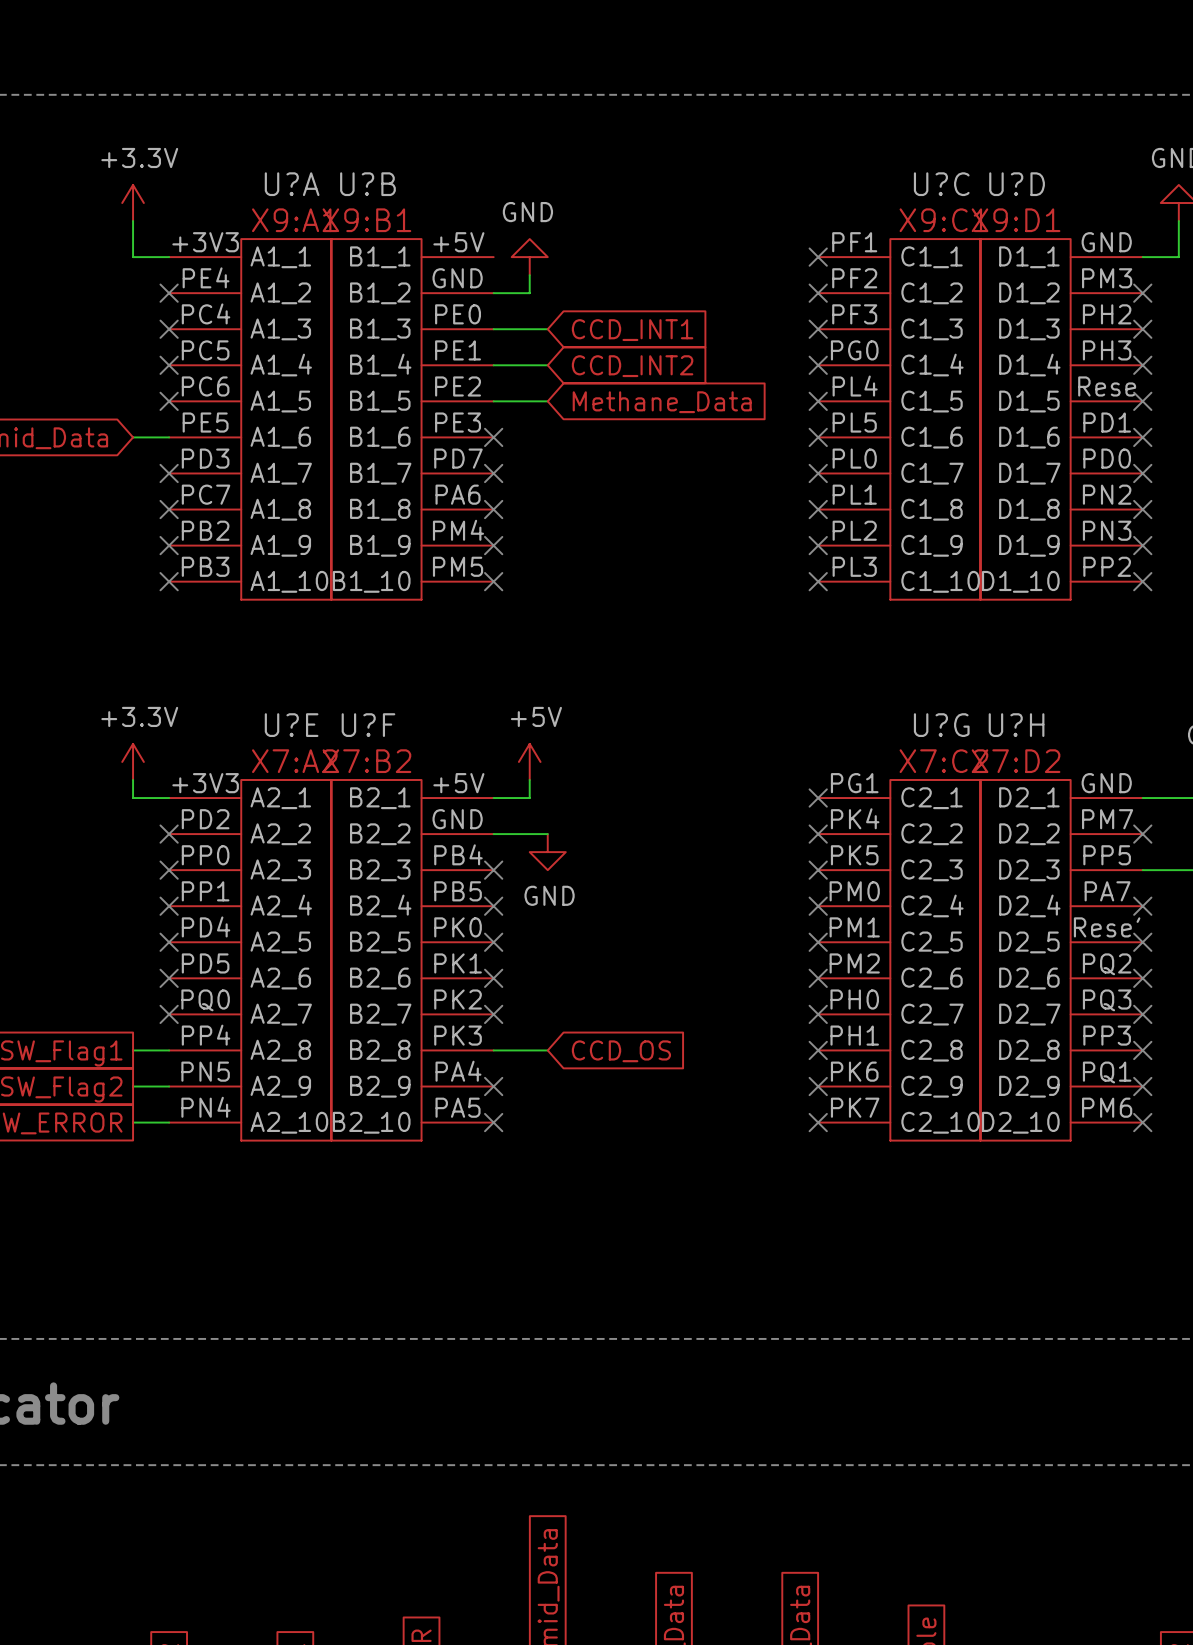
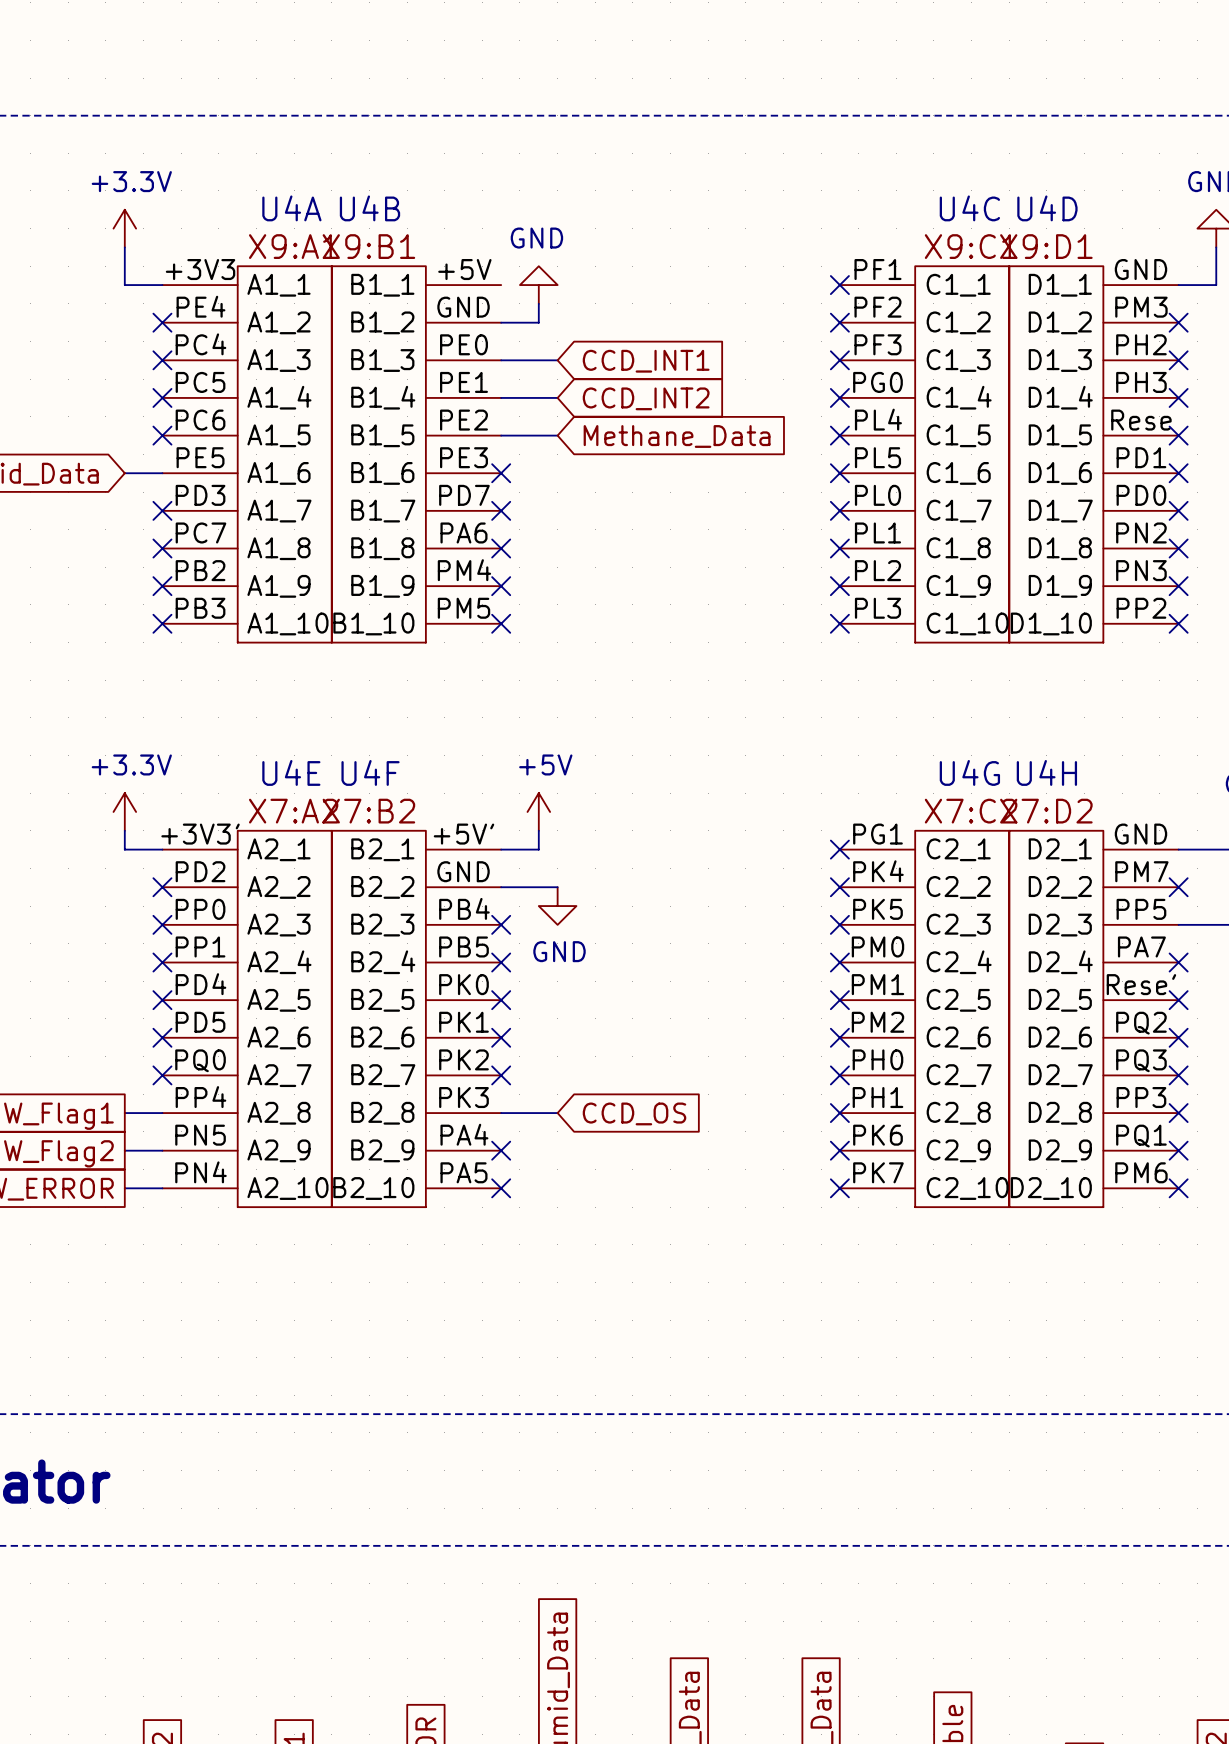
U?A name: U?A (292, 184) -> U4A (291, 208)
U?B name: U?B (367, 184) -> U4B (369, 208)
U?C name: U?C (941, 184) -> U4C (969, 208)
U?D name: U?D (1017, 184) -> U4D (1047, 208)
U?E name: U?E (291, 725) -> U4E (291, 772)
U?F name: U?F (368, 725) -> U4F (370, 772)
U?G name: U?G (941, 725) -> U4G (969, 772)
U?H name: U?H (1016, 725) -> U4H (1046, 772)
U?E pin number: +3V3 (205, 783) -> +3V3' (200, 834)
U?F pin number: +5V (458, 783) -> +5V' (463, 834)

